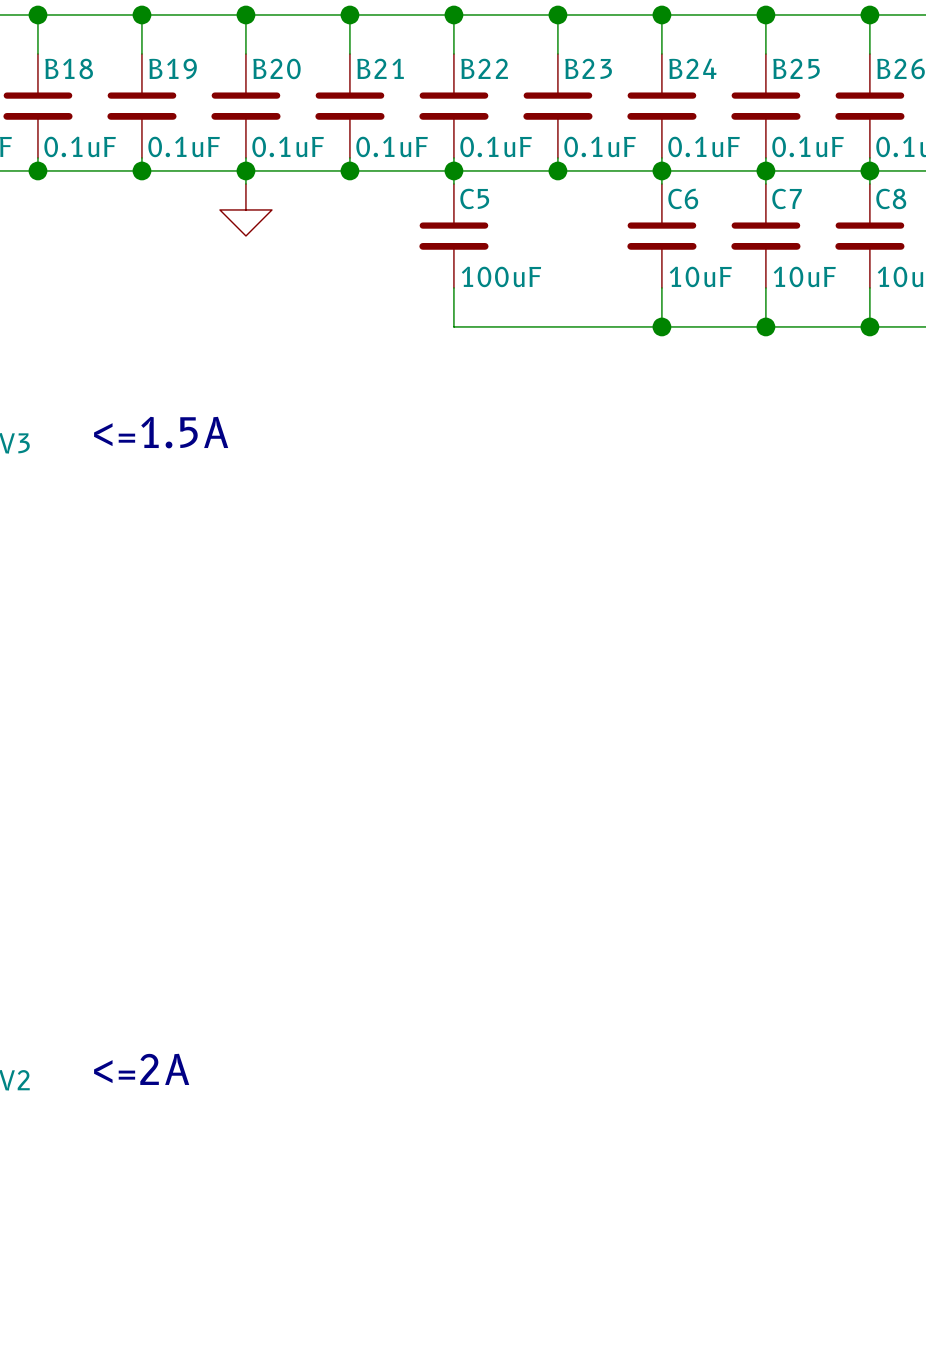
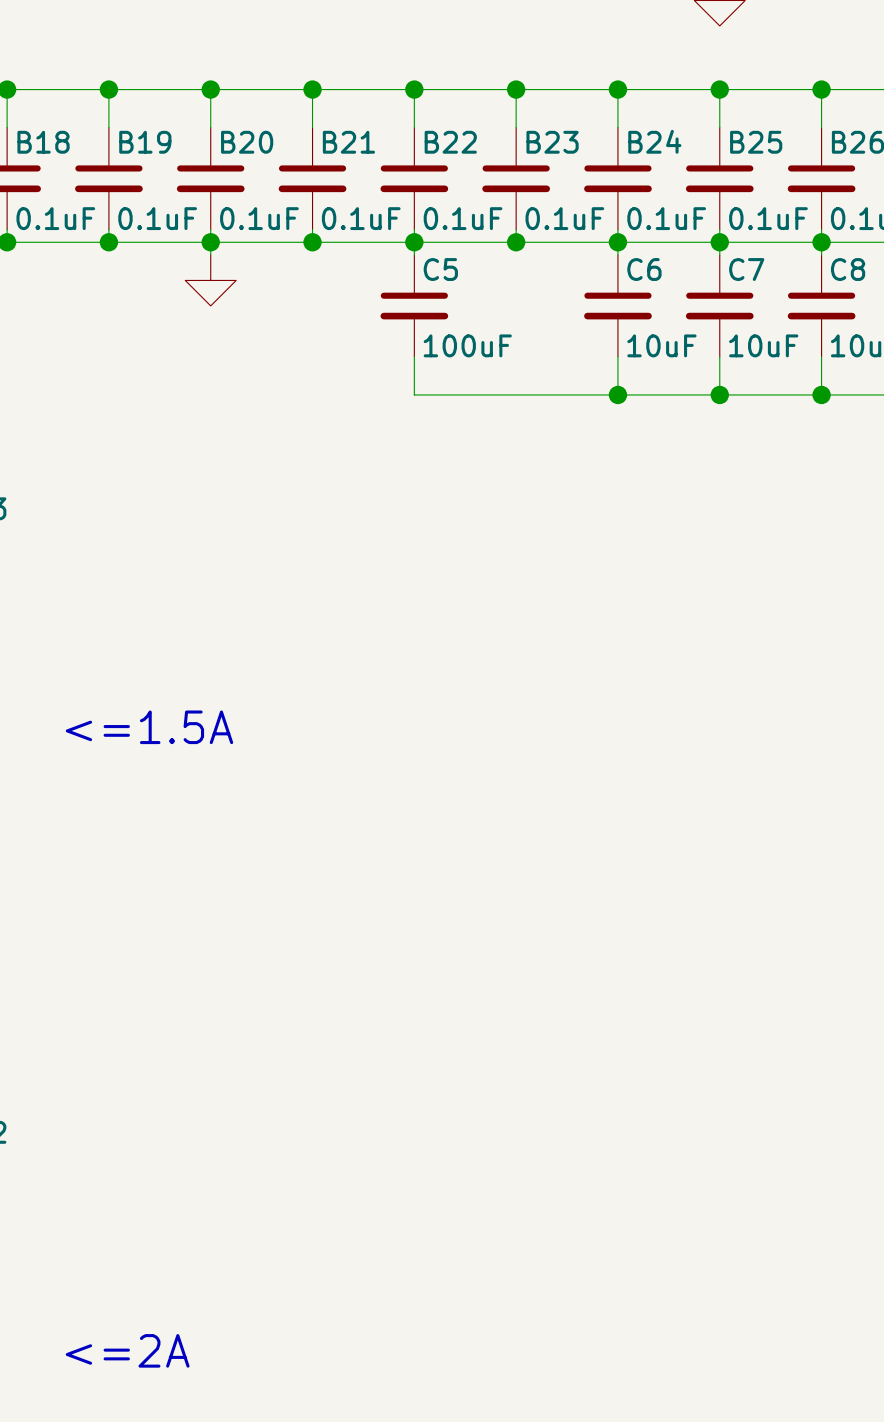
text position: <=1.5A (161, 432) -> <=1.5A (149, 727)
text position: <=2A (141, 1069) -> <=2A (127, 1350)

